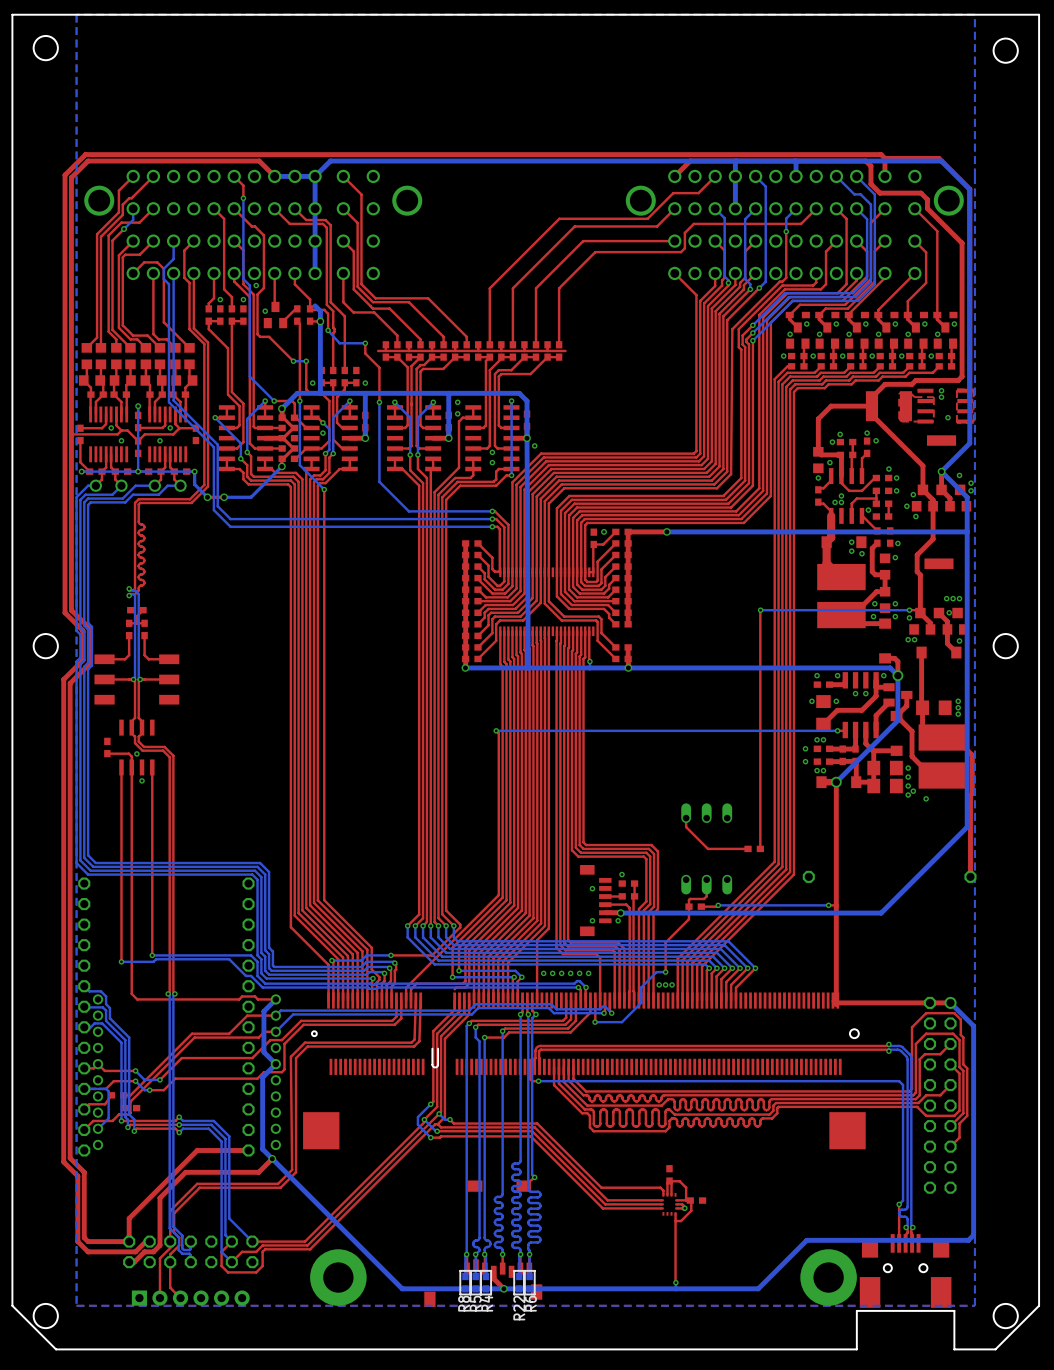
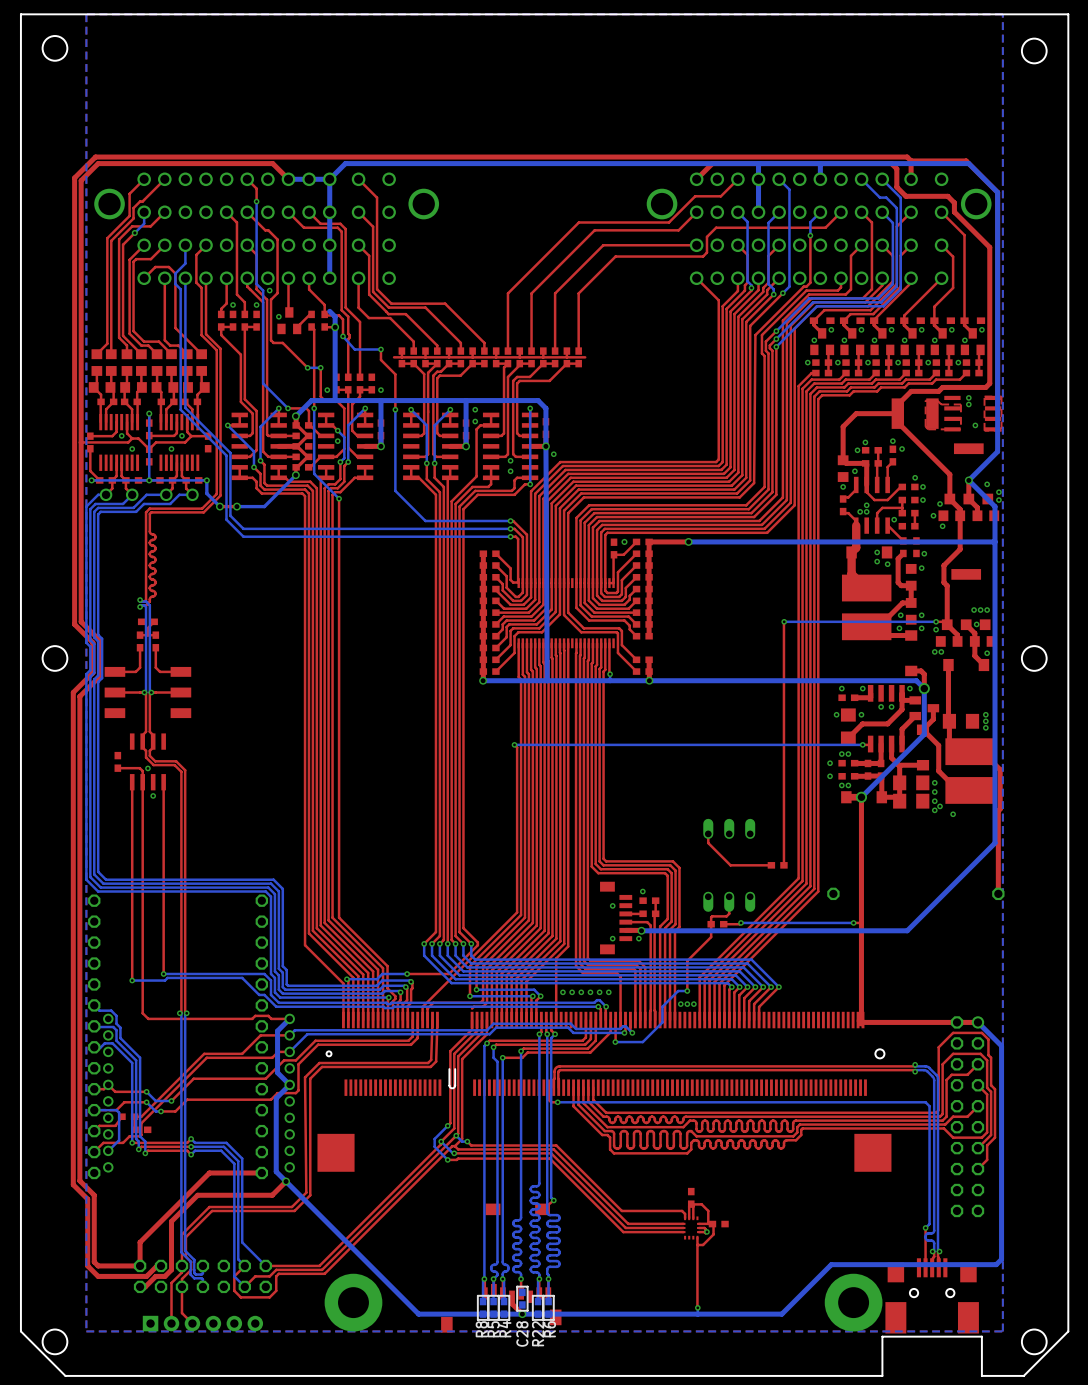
C28: none -> (522, 1298)

